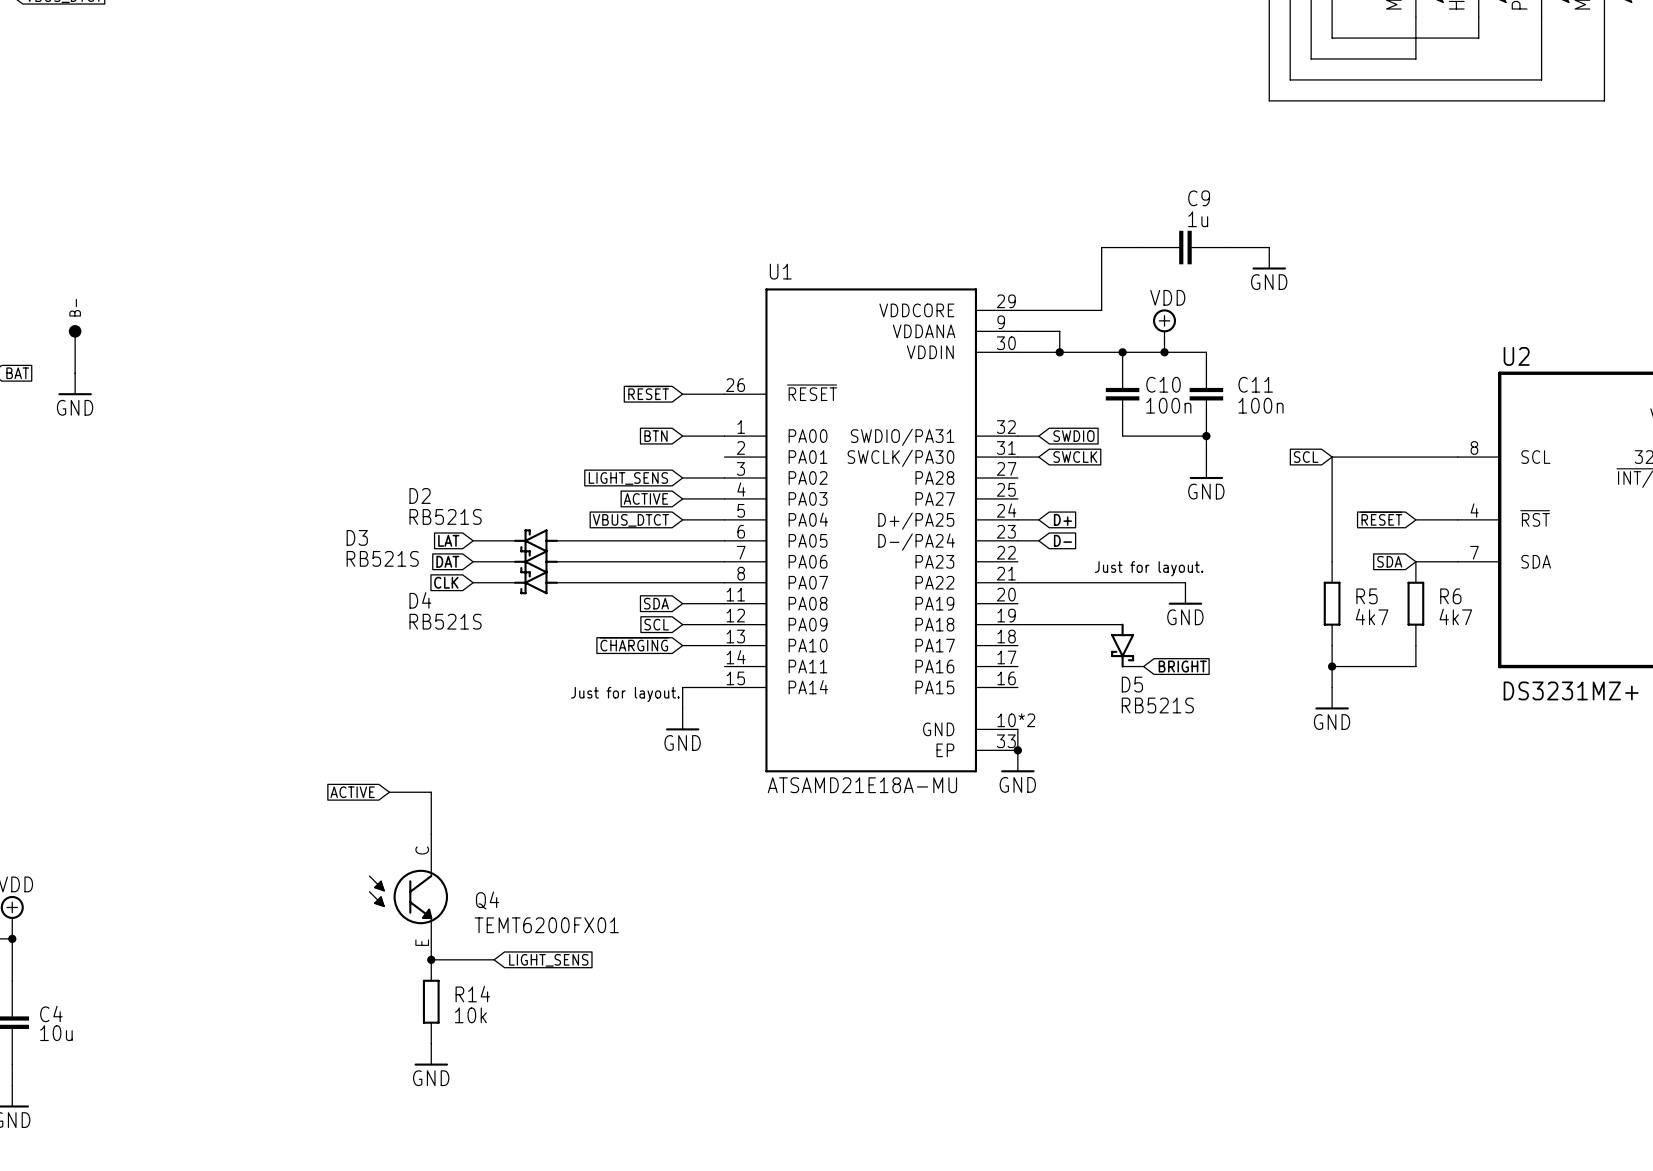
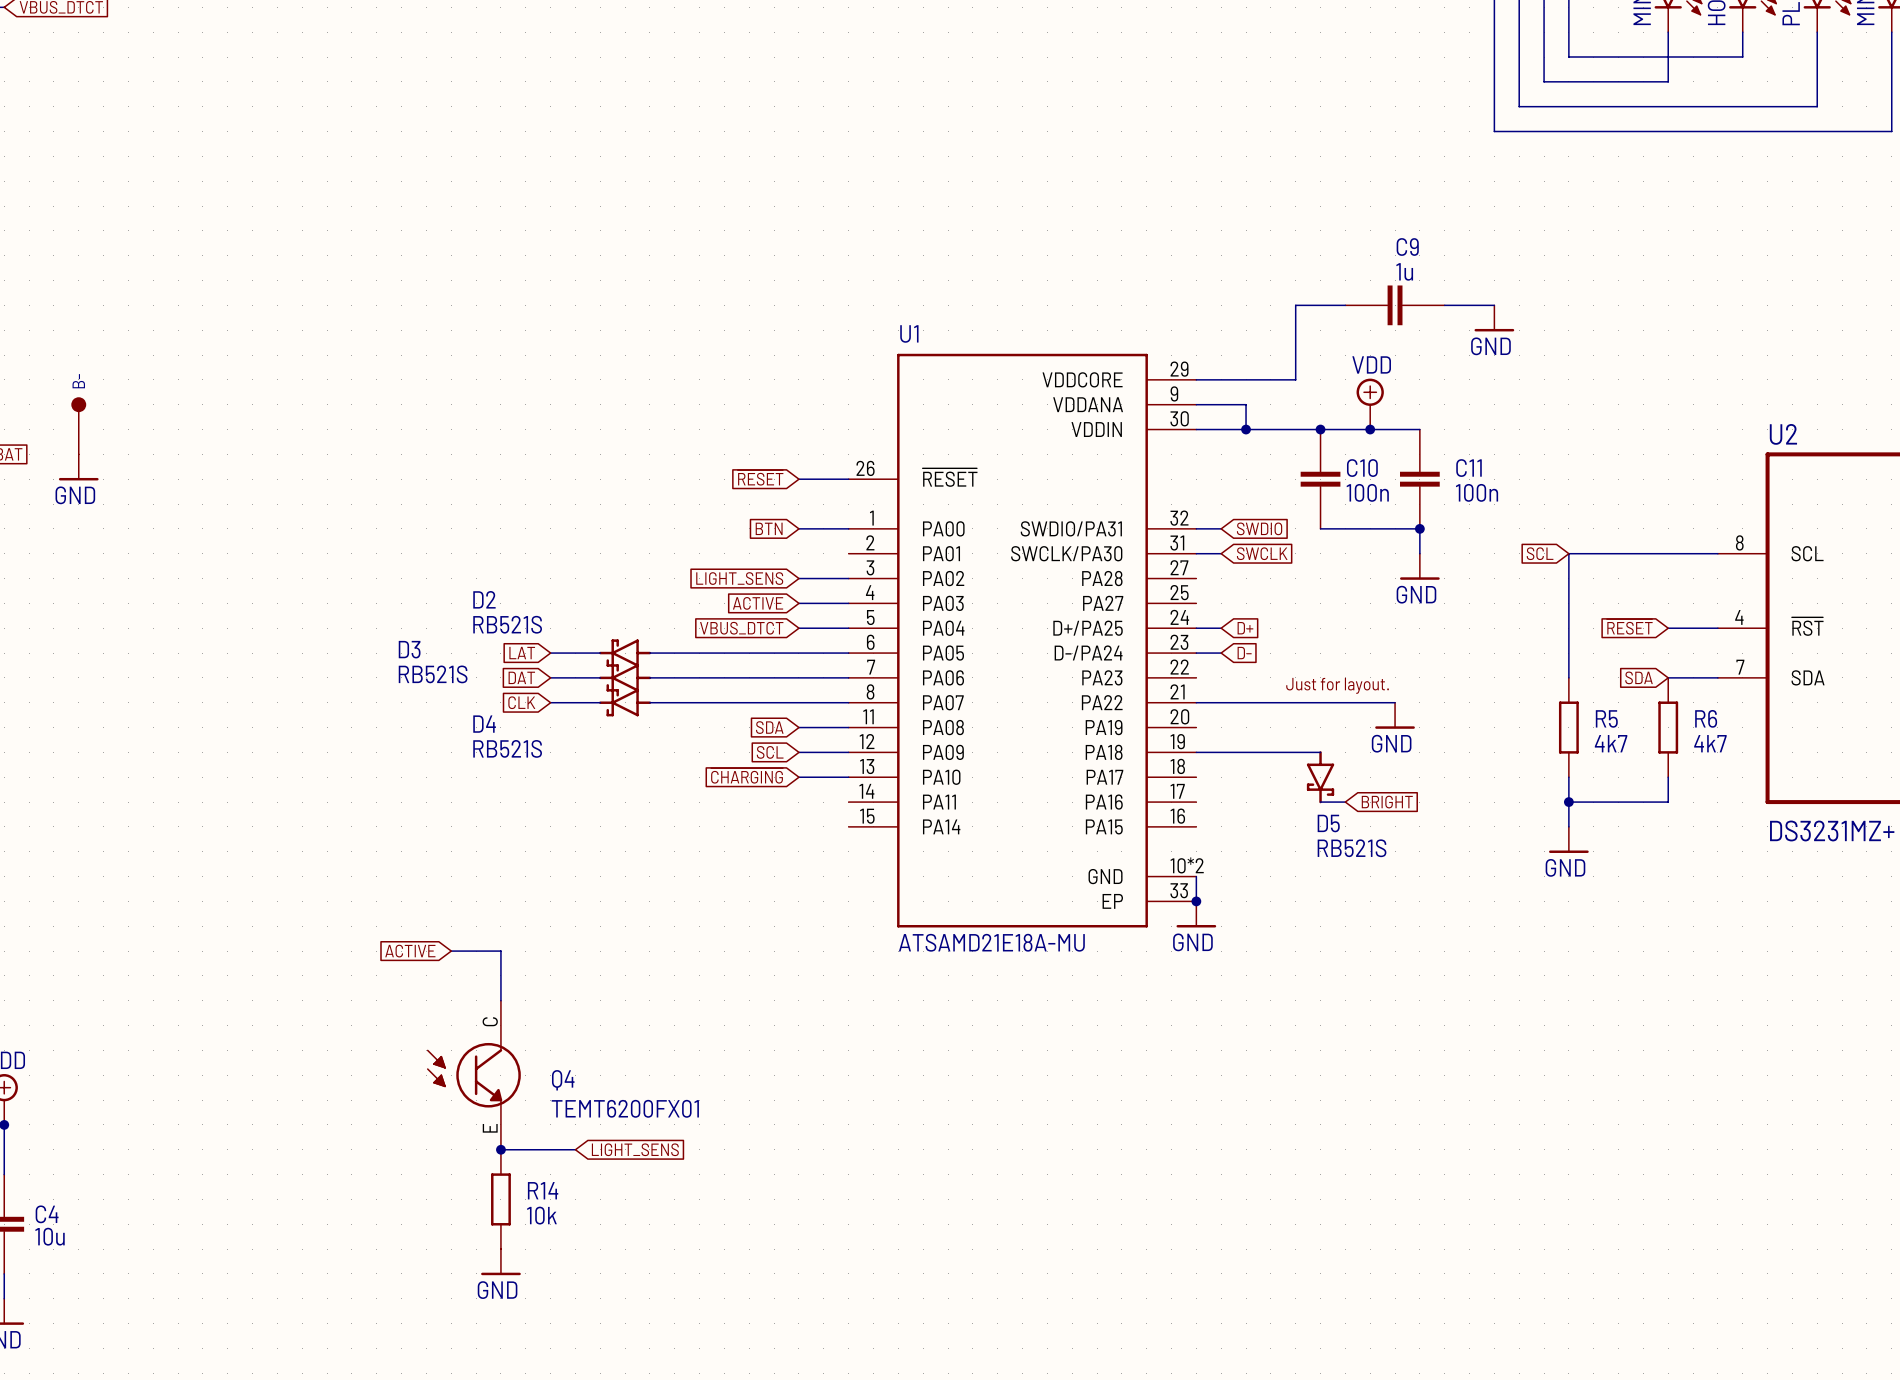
wire: (724, 687) (682, 687) (682, 708) -> none
text: Just for layout. (625, 694) -> none
power symbol: GND (682, 719) -> none

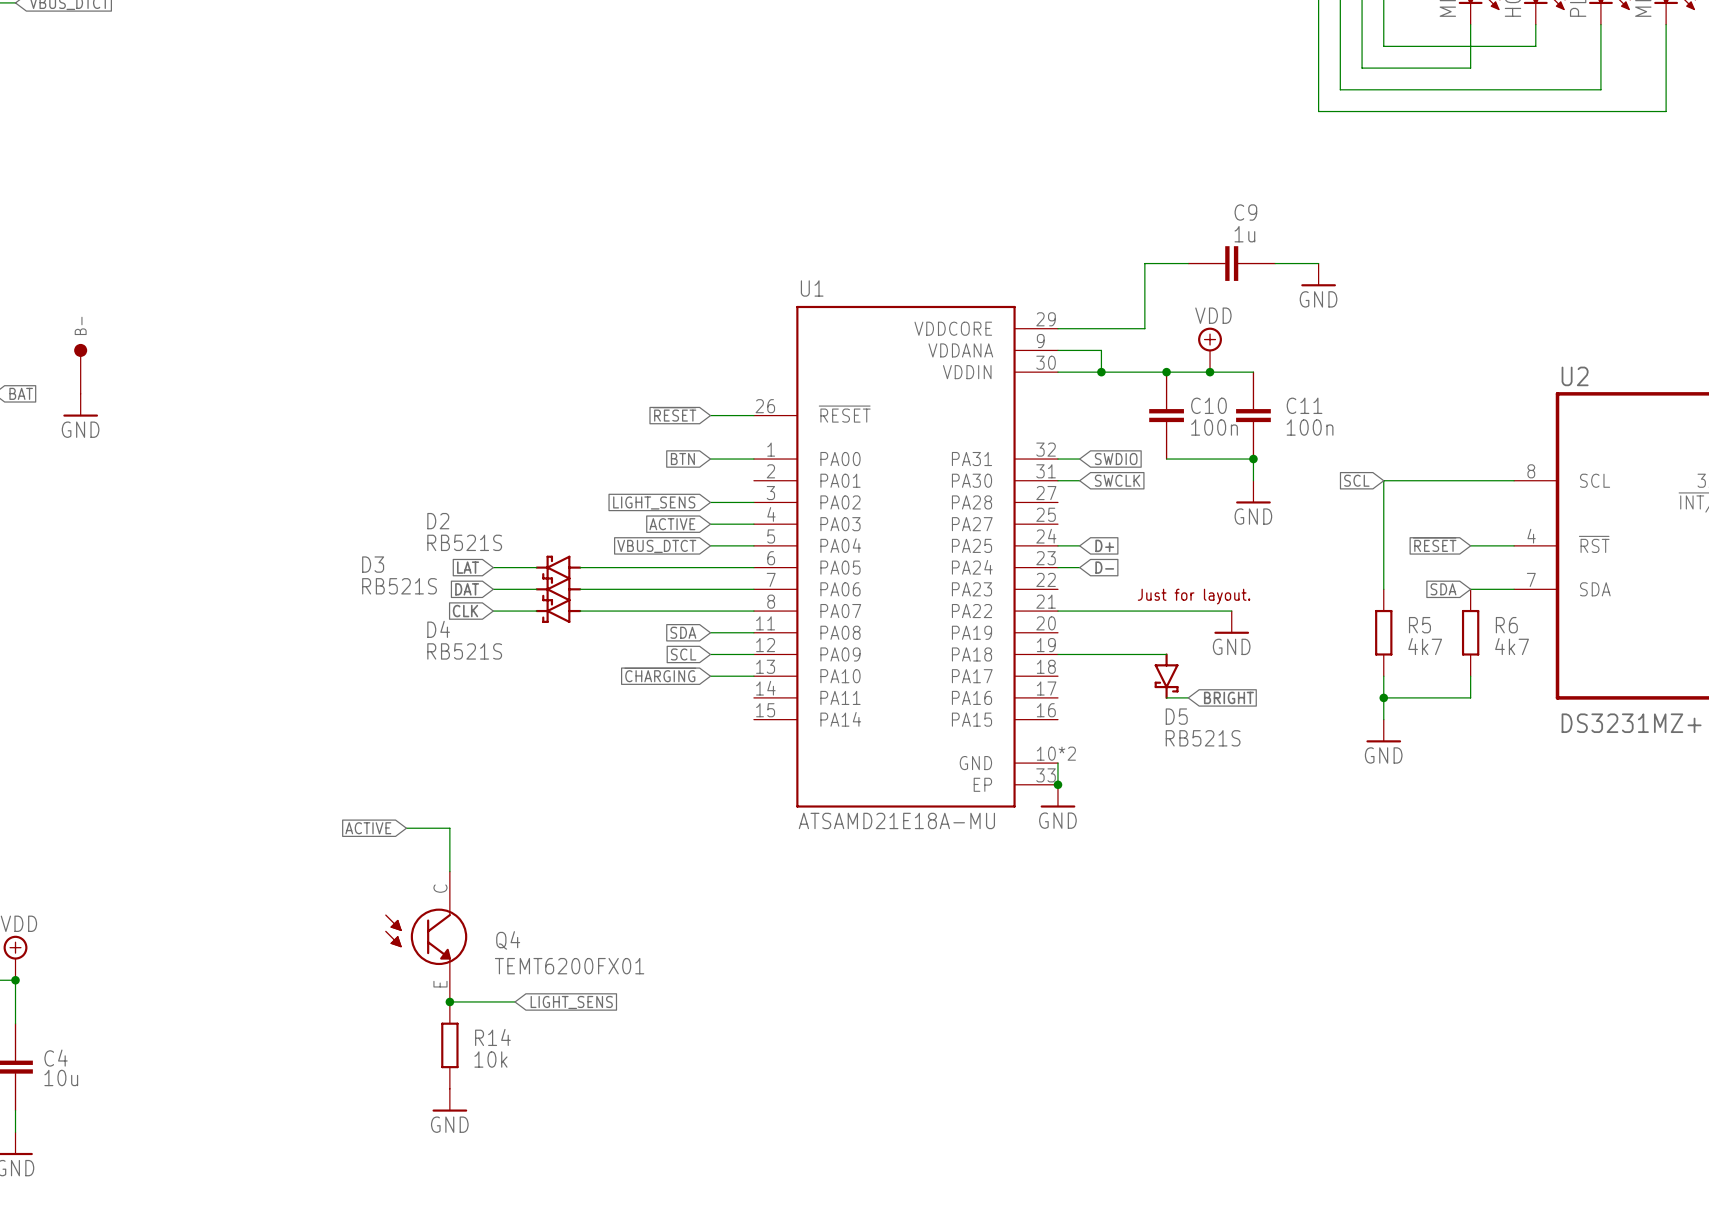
U1 pin name: SWDIO/PA31 (1071, 528) -> PA31 (971, 459)
U1 pin name: SWCLK/PA30 (1066, 553) -> PA30 (971, 480)
U1 pin name: D+/PA25 (1088, 628) -> PA25 (971, 545)
U1 pin name: D-/PA24 (1088, 652) -> PA24 (972, 567)

